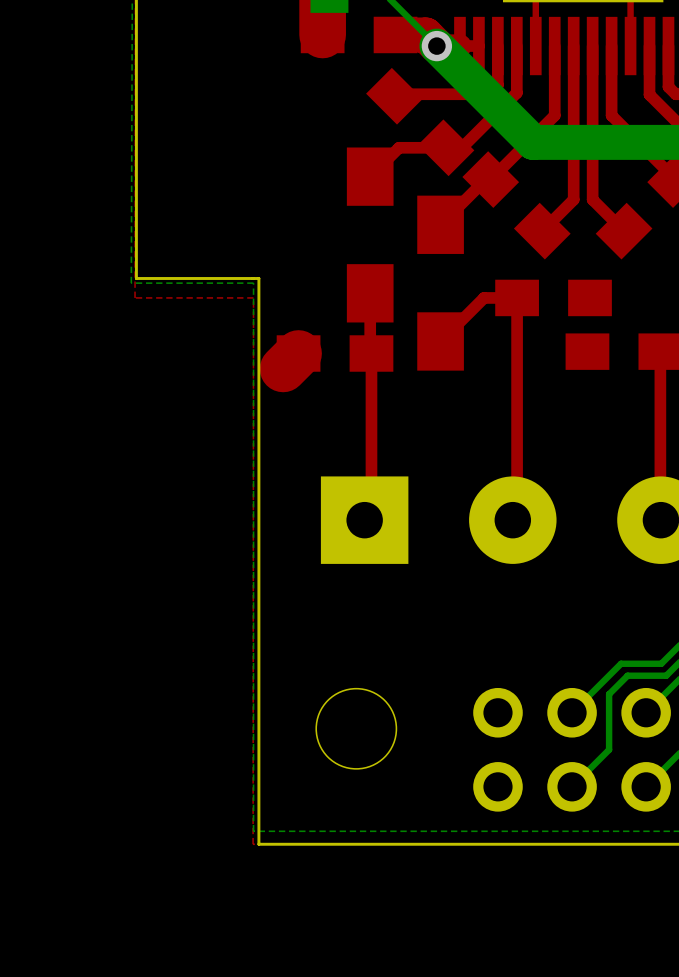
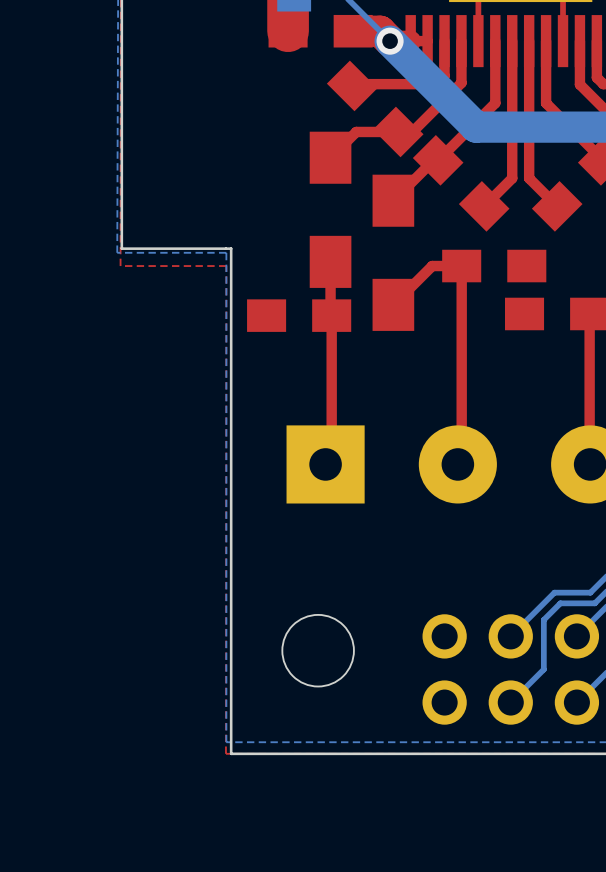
top track: (298, 353) (283, 368) -> none

